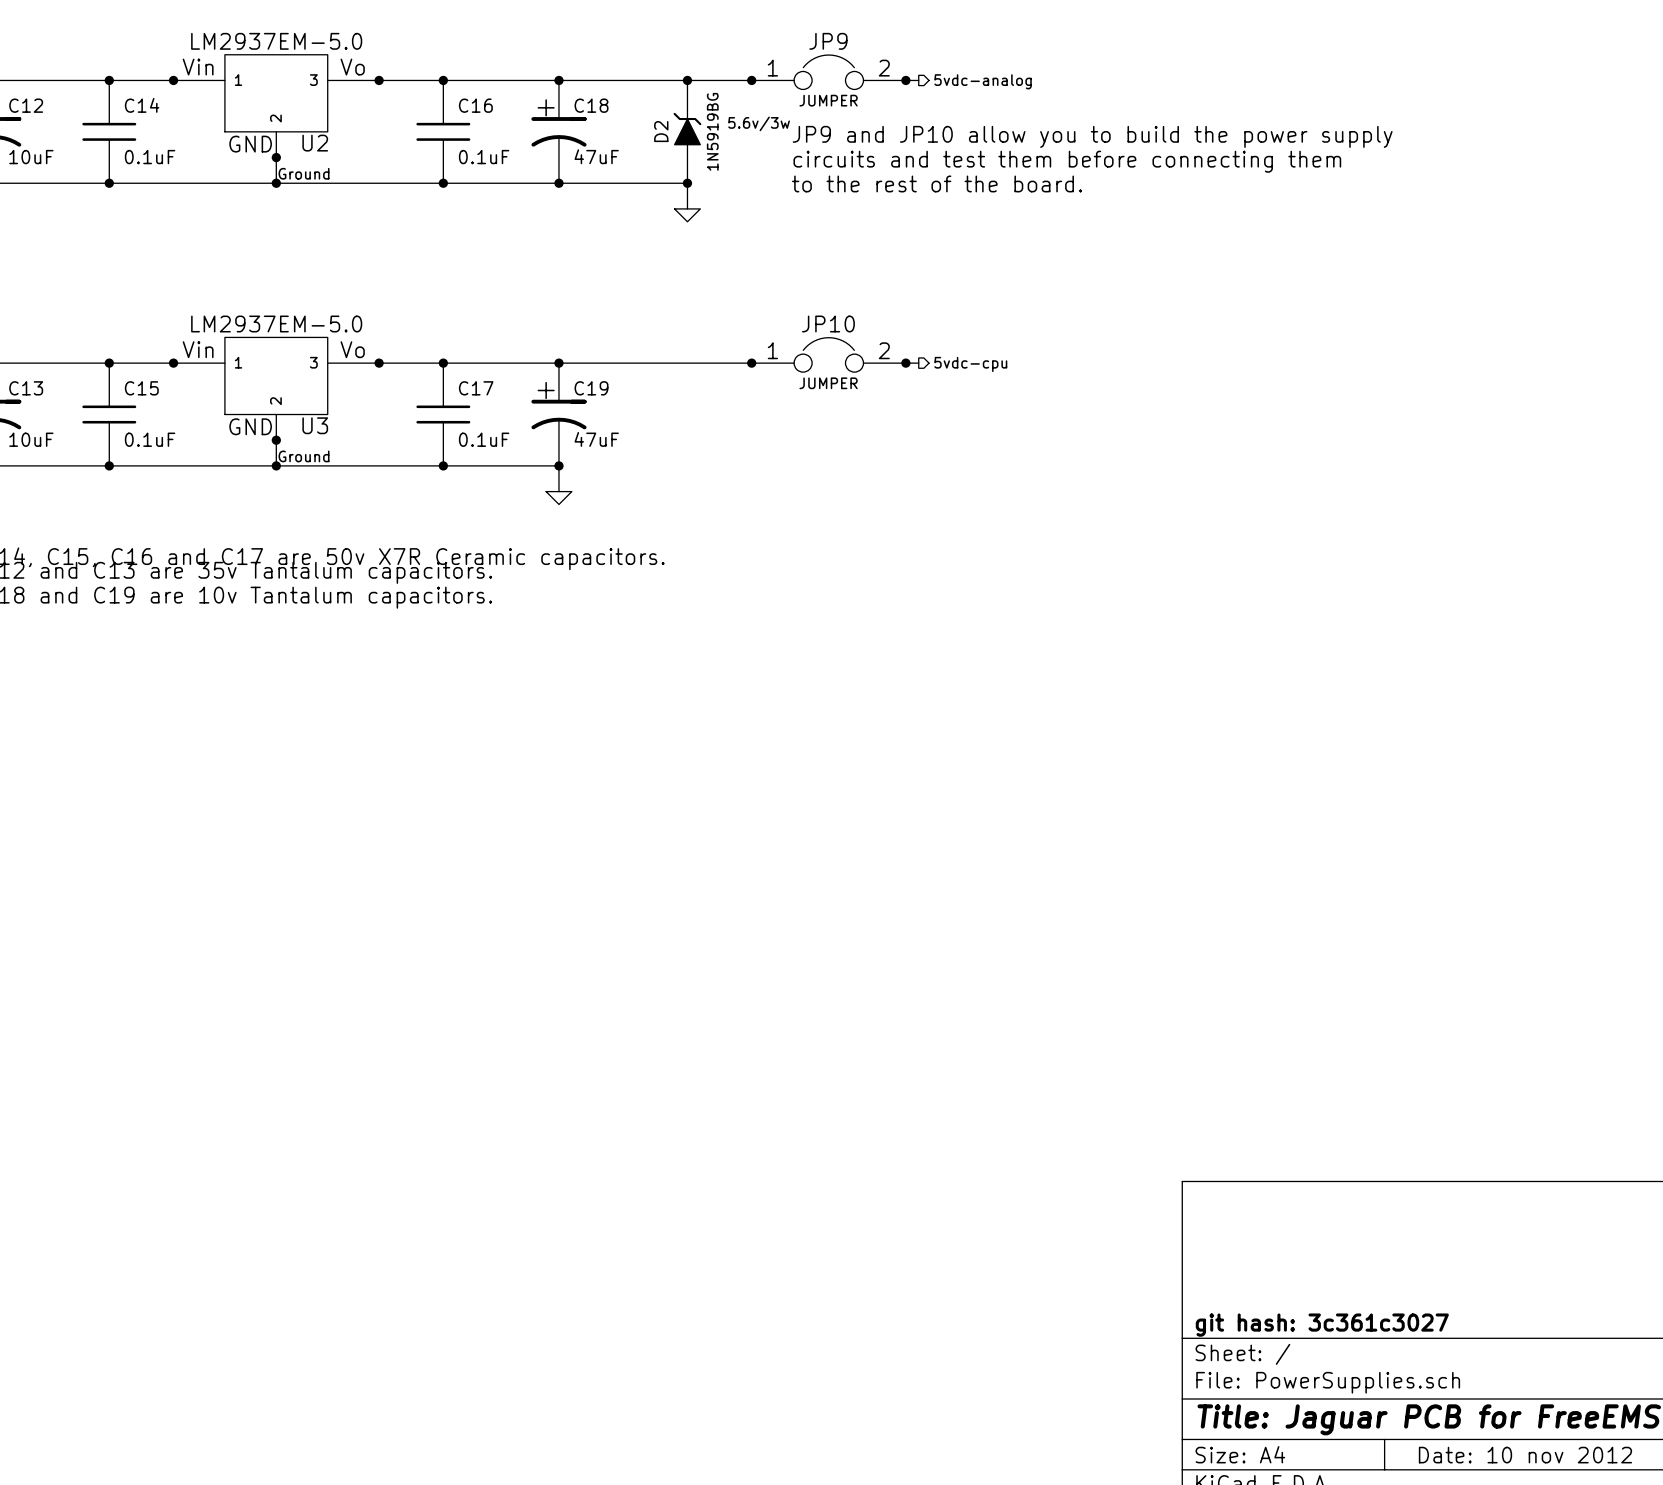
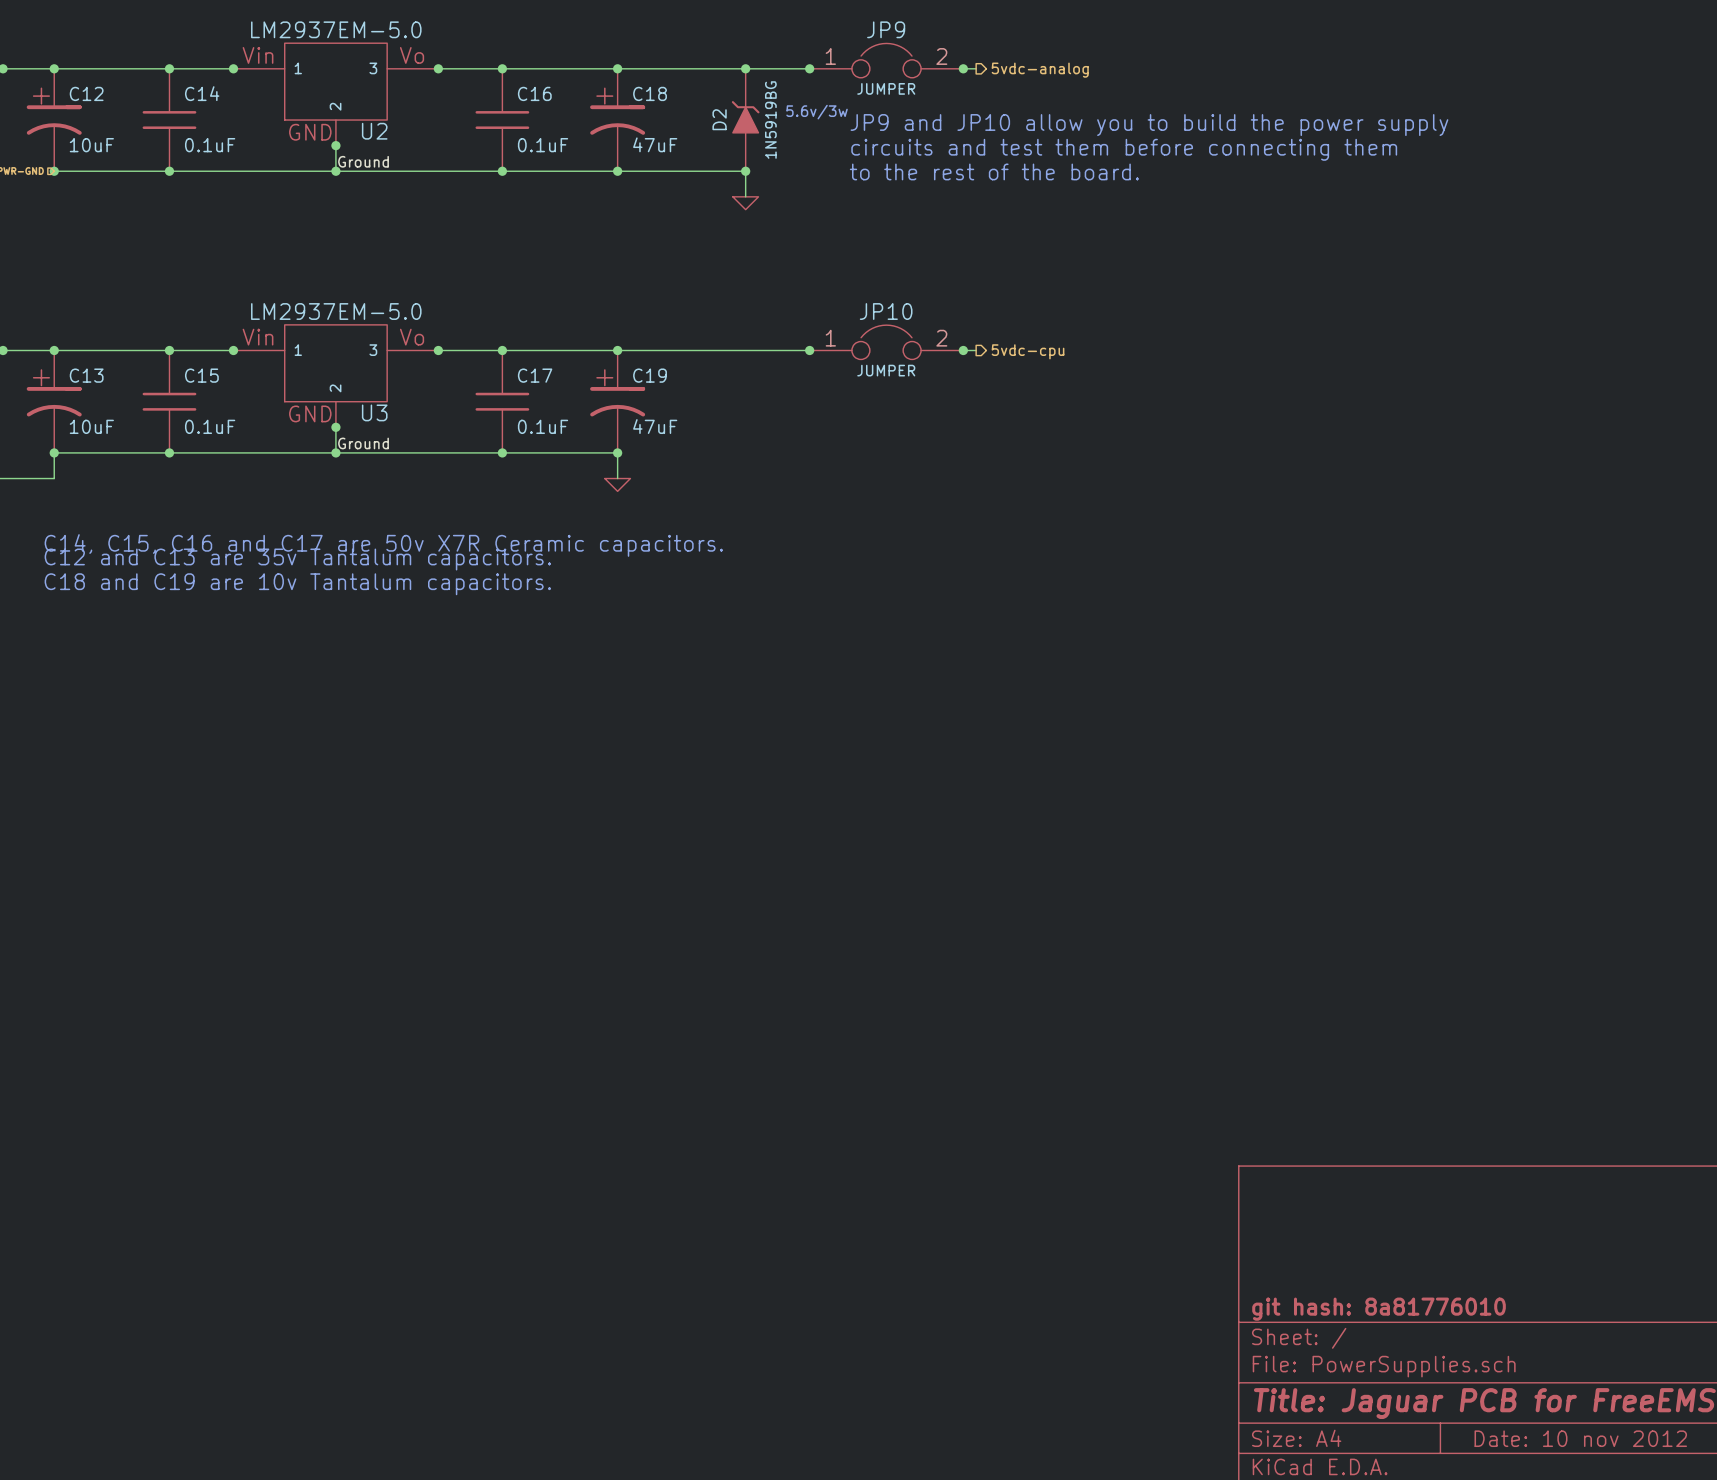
title block: git hash: 3c361c3027 (1322, 1325) -> git hash: 8a81776010 (1379, 1309)

